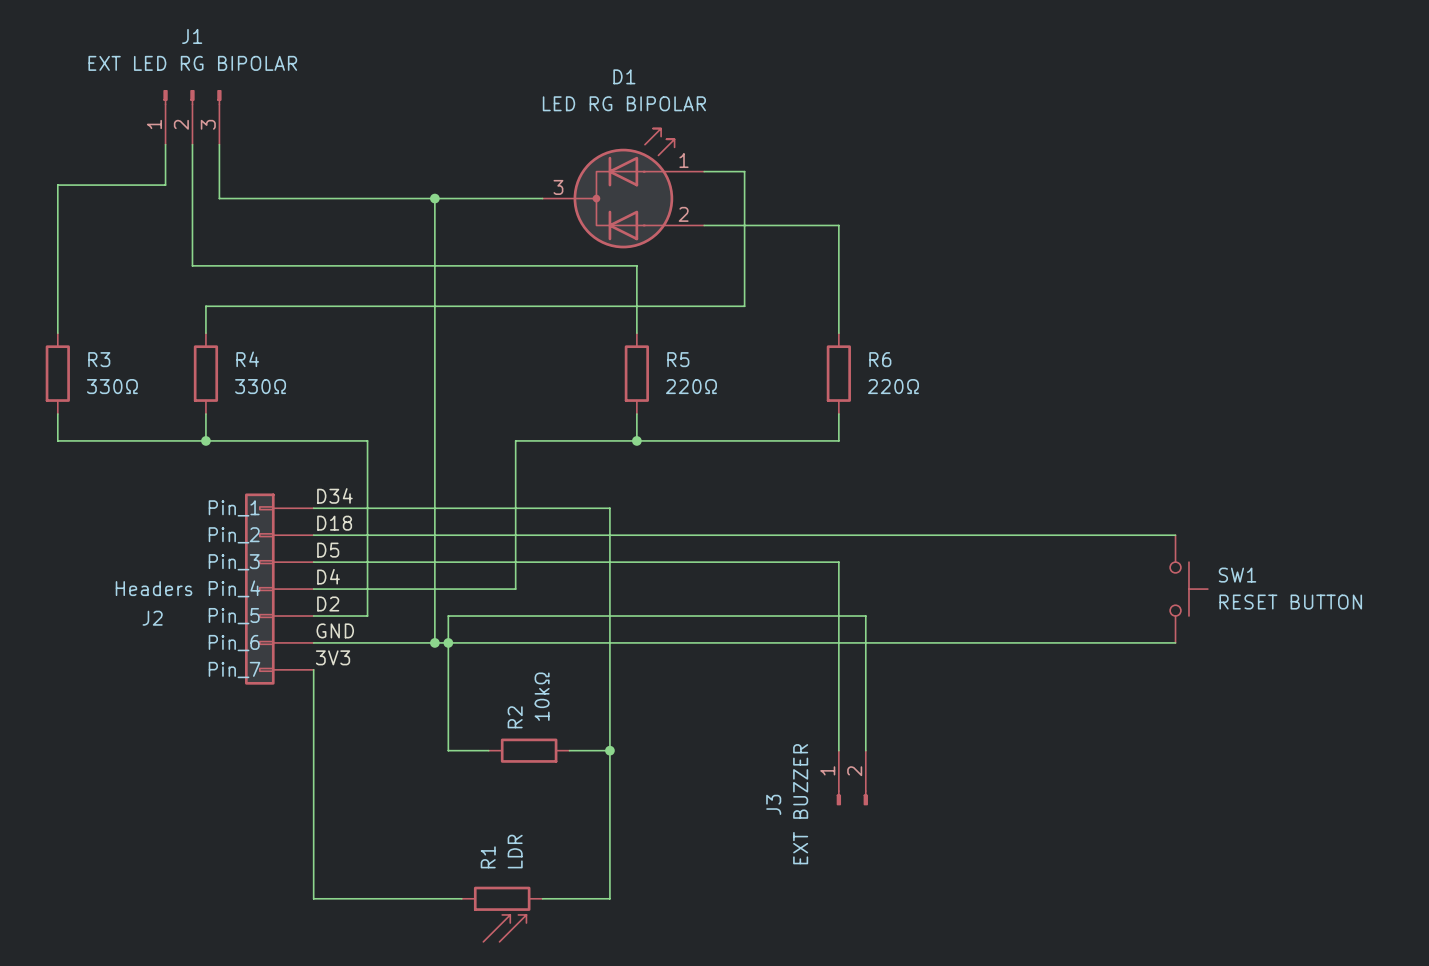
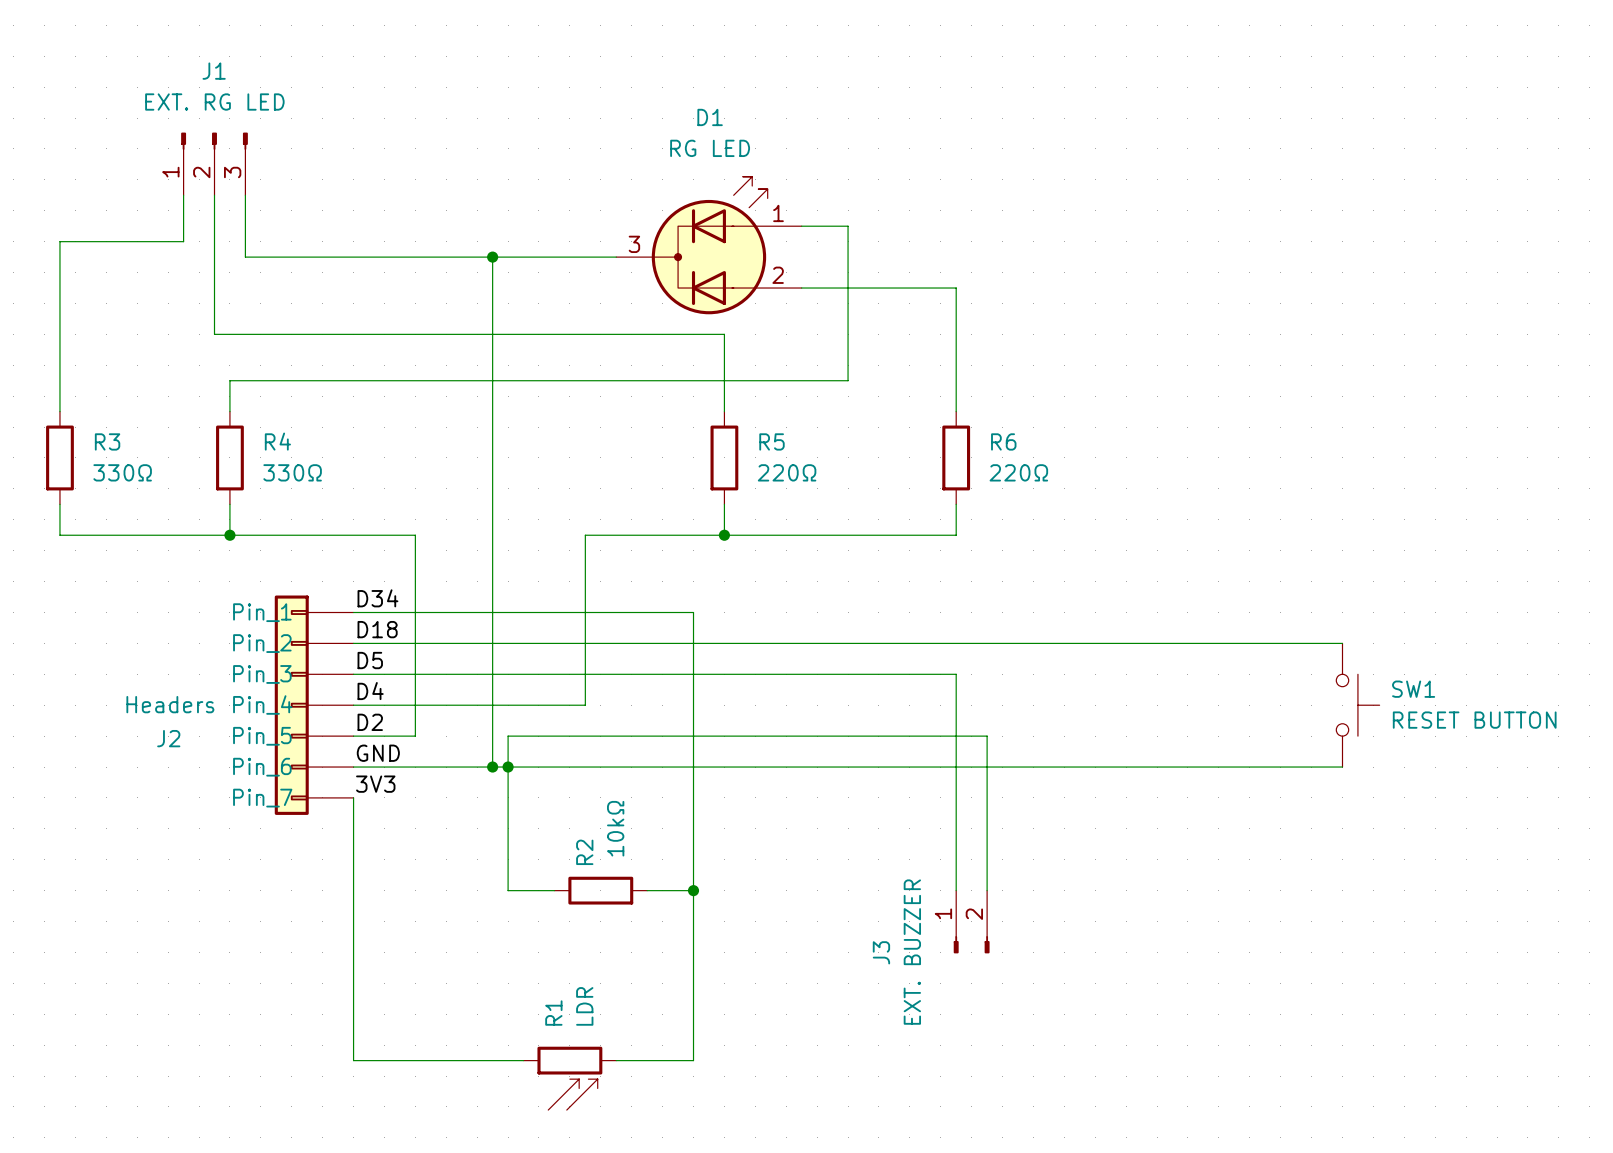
J1 value: EXT LED RG BIPOLAR (192, 63) -> EXT. RG LED (214, 102)
D1 value: LED RG BIPOLAR (624, 103) -> RG LED (710, 148)
J3 value: EXT BUZZER (800, 804) -> EXT. BUZZER (912, 952)

